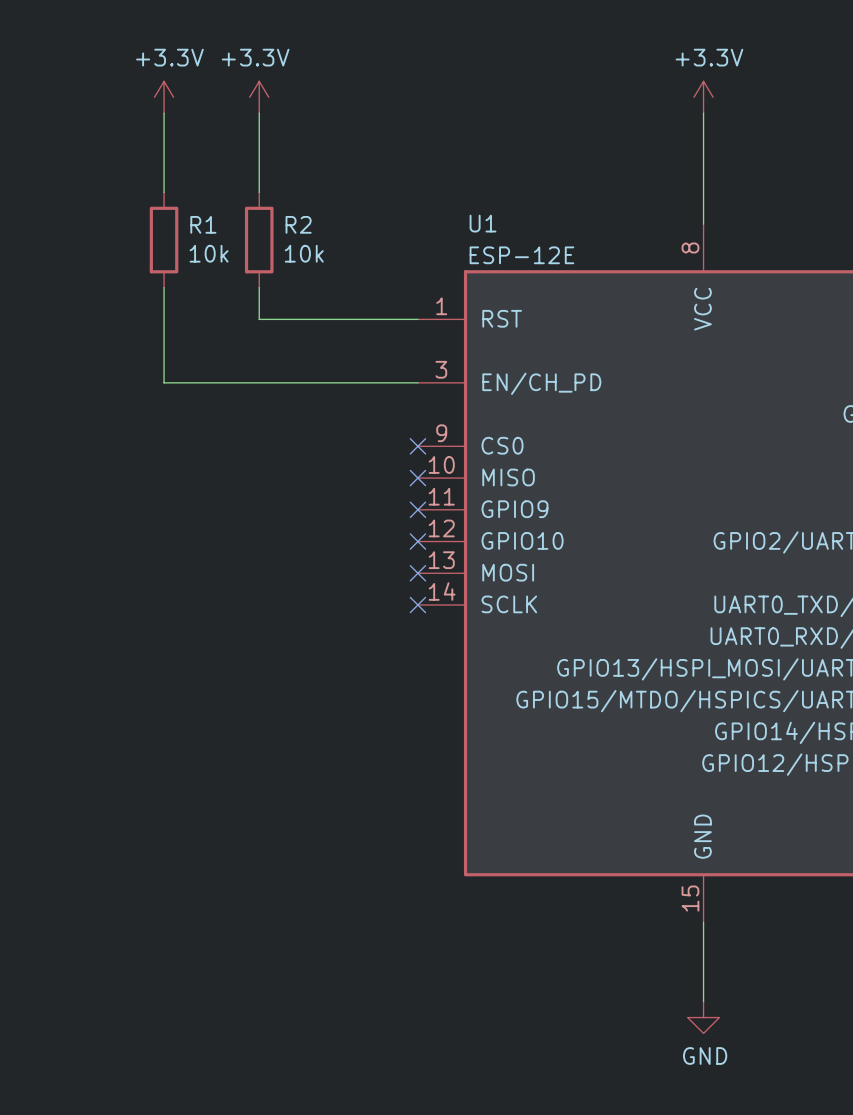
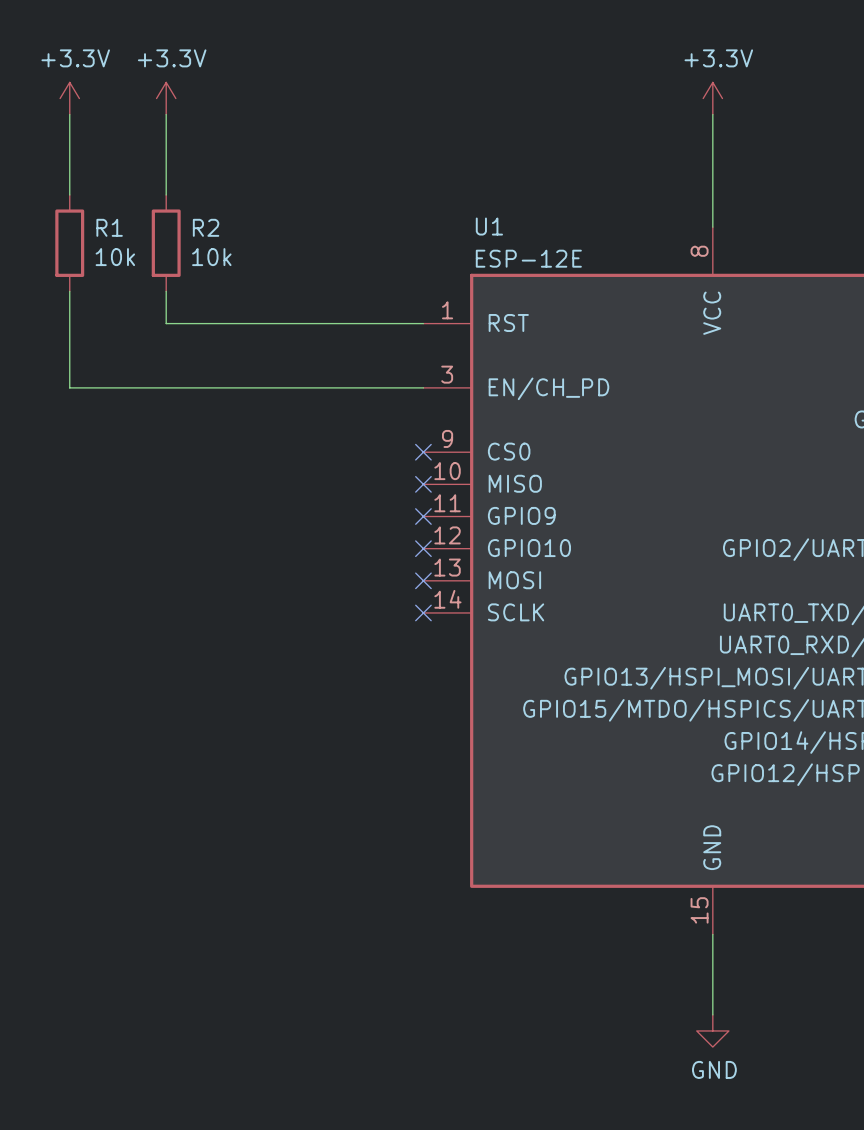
power symbol text position: +3.3V (255, 57) -> +3.3V (75, 58)
power symbol position: +3.3V (259, 97) -> +3.3V (69, 98)
wire: (259, 113) (259, 192) -> (69, 114) (69, 194)
R1 name: R1 (203, 224) -> R2 (206, 227)
R1: none -> 10k (69, 243)
R2: 10k (259, 240) -> none
wire: (259, 287) (259, 319) -> (166, 323) (262, 323)
wire: (164, 319) (164, 382) -> (69, 291) (69, 387) (166, 387)

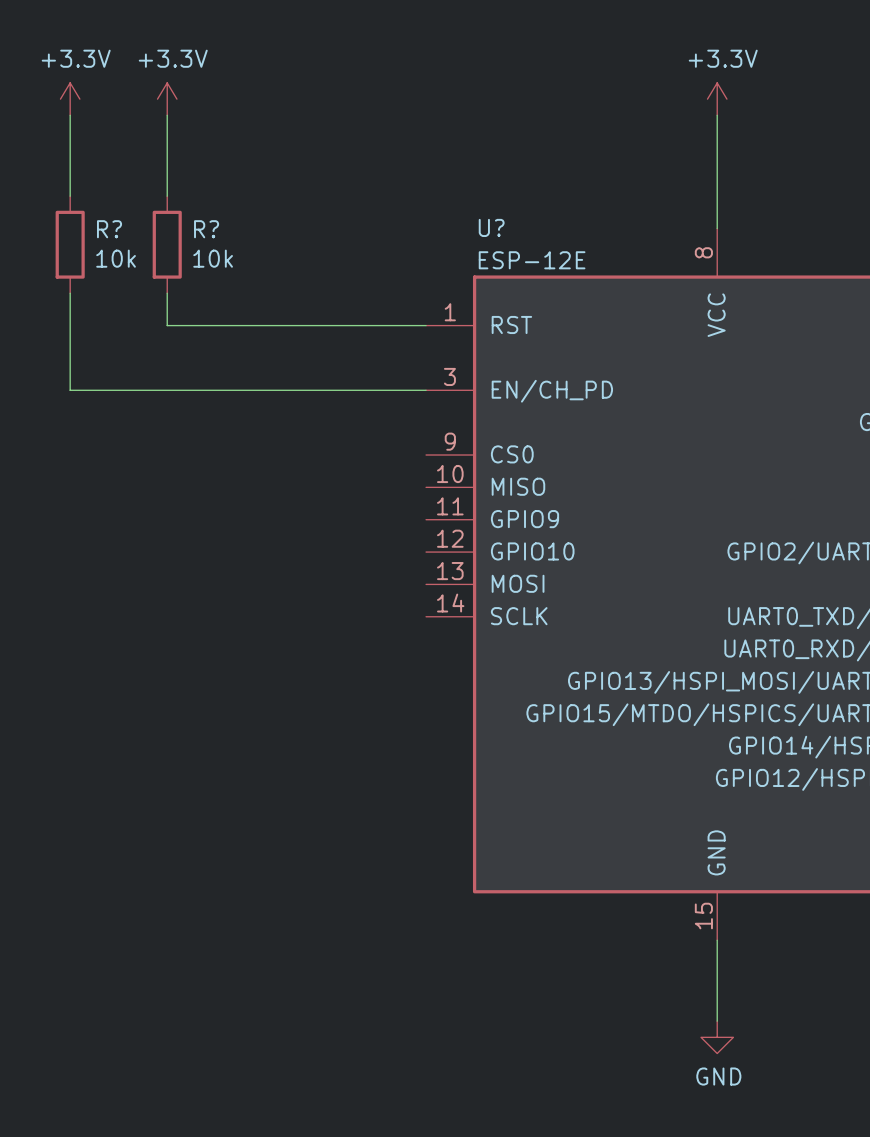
U1 name: U1 (489, 226) -> U? (491, 227)
R1 name: R1 (109, 227) -> R? (109, 229)
R2 name: R2 (206, 227) -> R? (206, 229)
no-connect mark: (423, 452) -> none
no-connect mark: (423, 484) -> none
no-connect mark: (423, 516) -> none
no-connect mark: (423, 548) -> none
no-connect mark: (423, 580) -> none
no-connect mark: (423, 612) -> none

